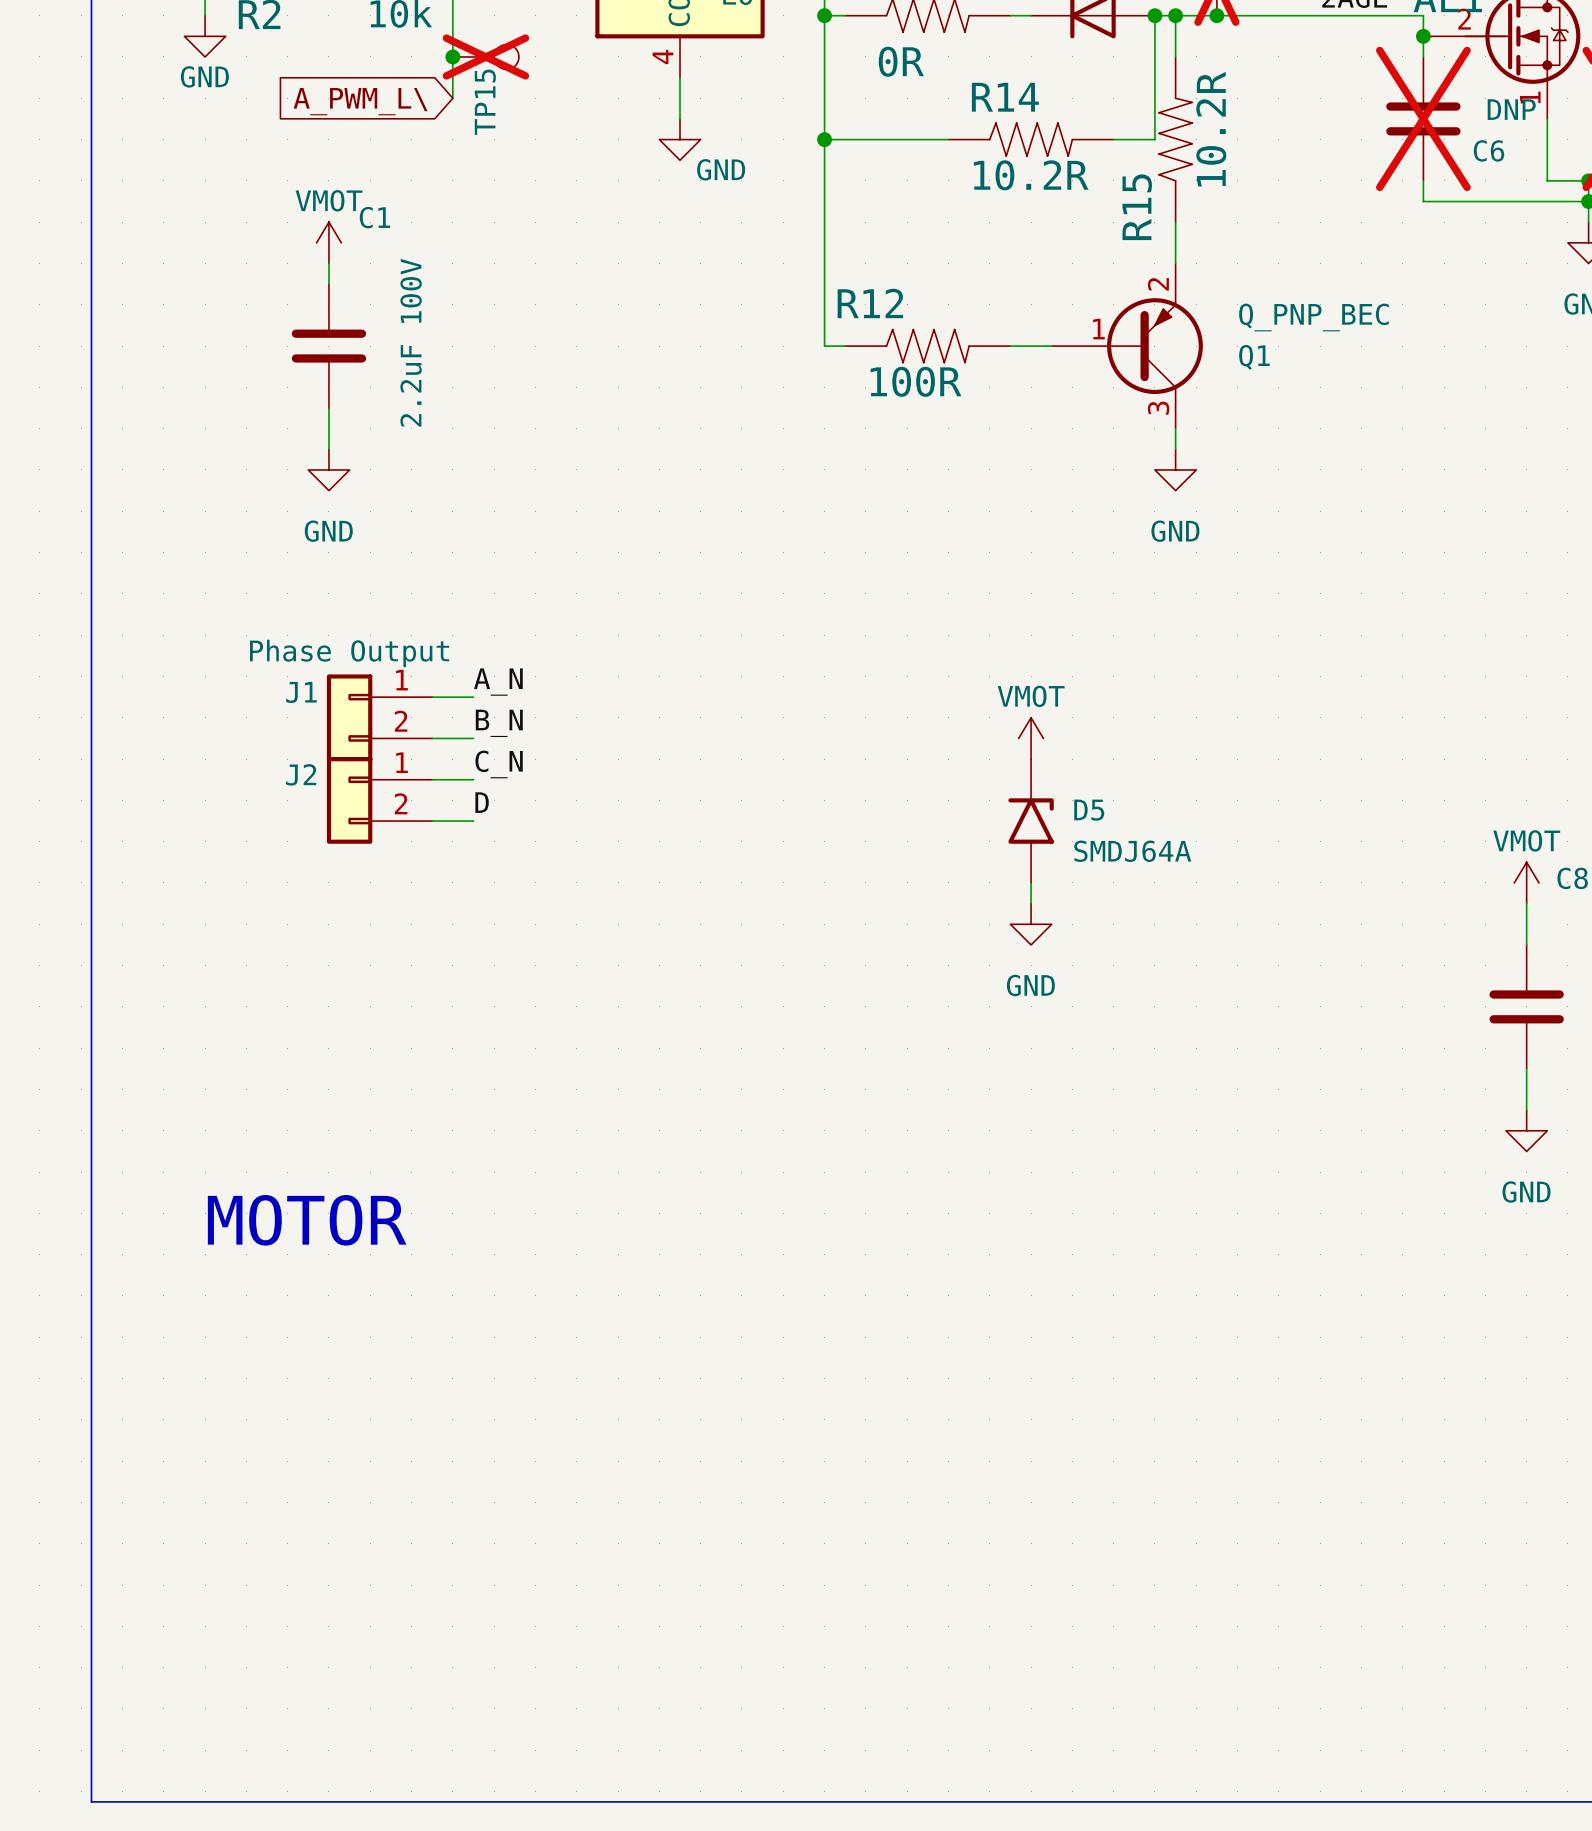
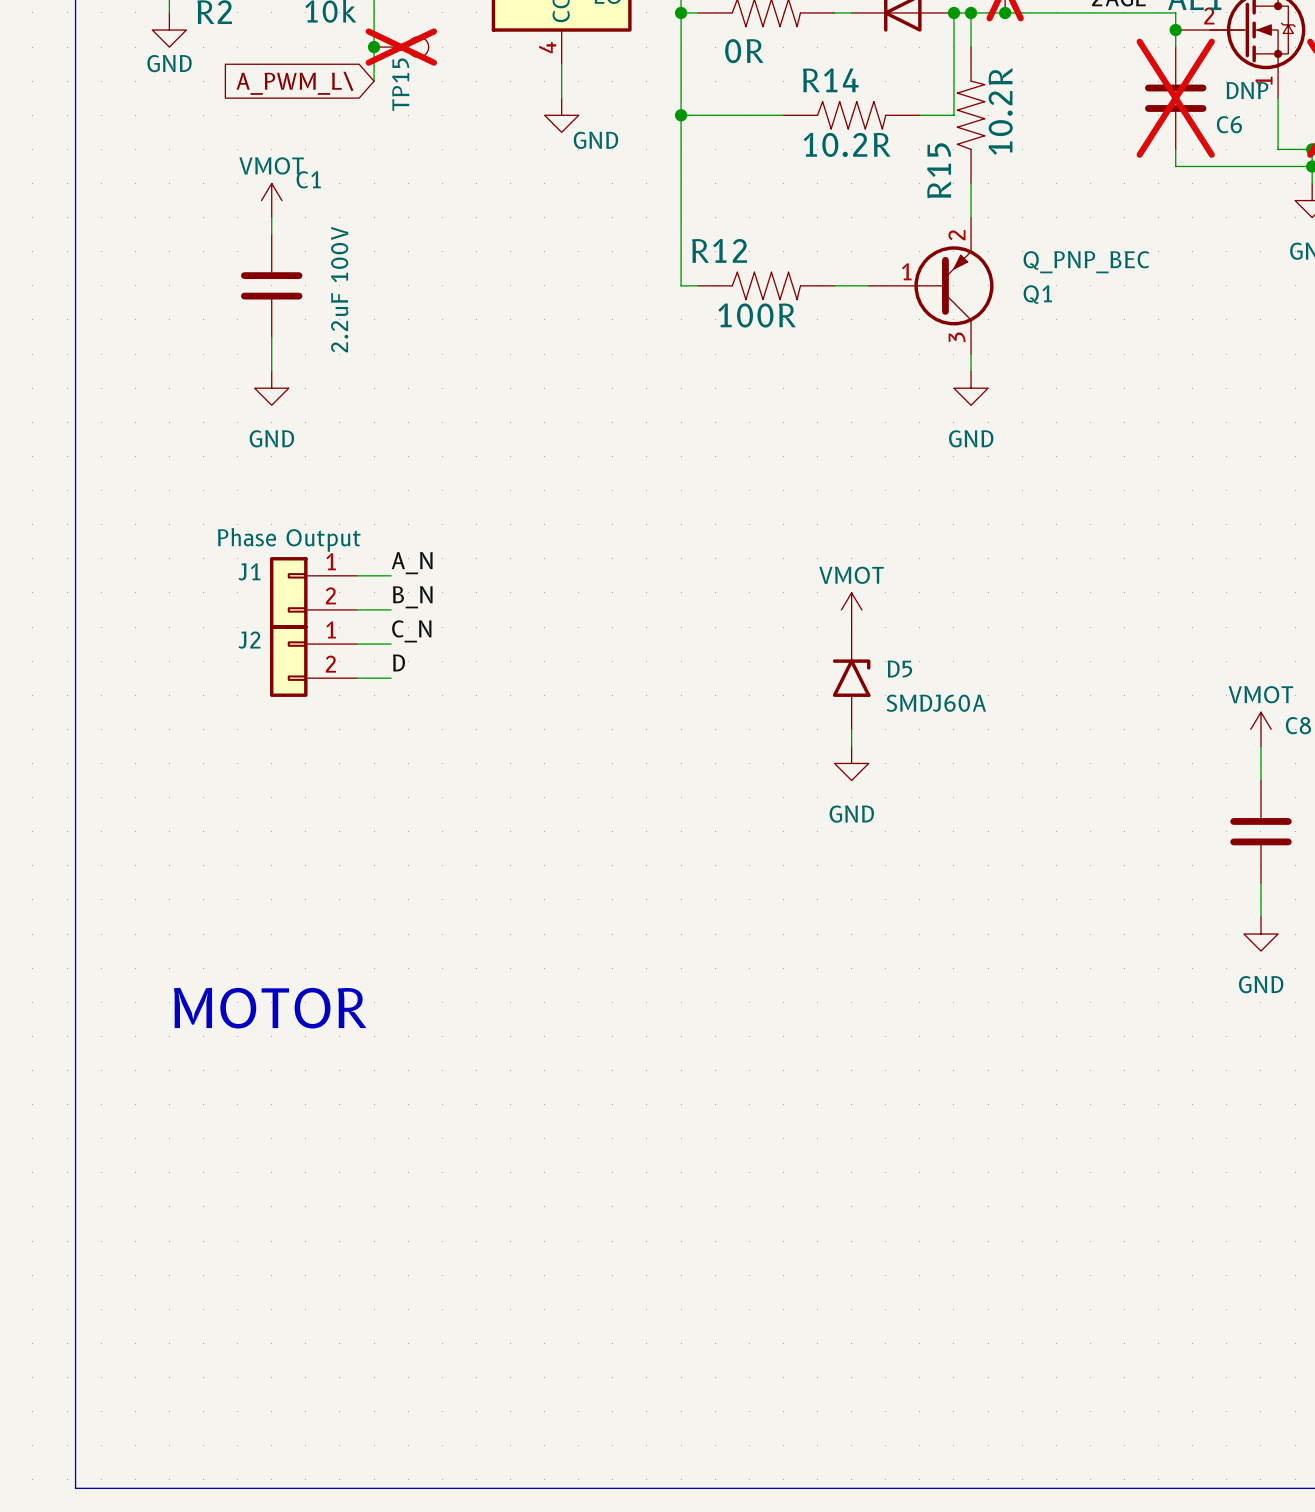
D5 value: SMDJ64A (1132, 851) -> SMDJ60A (936, 703)

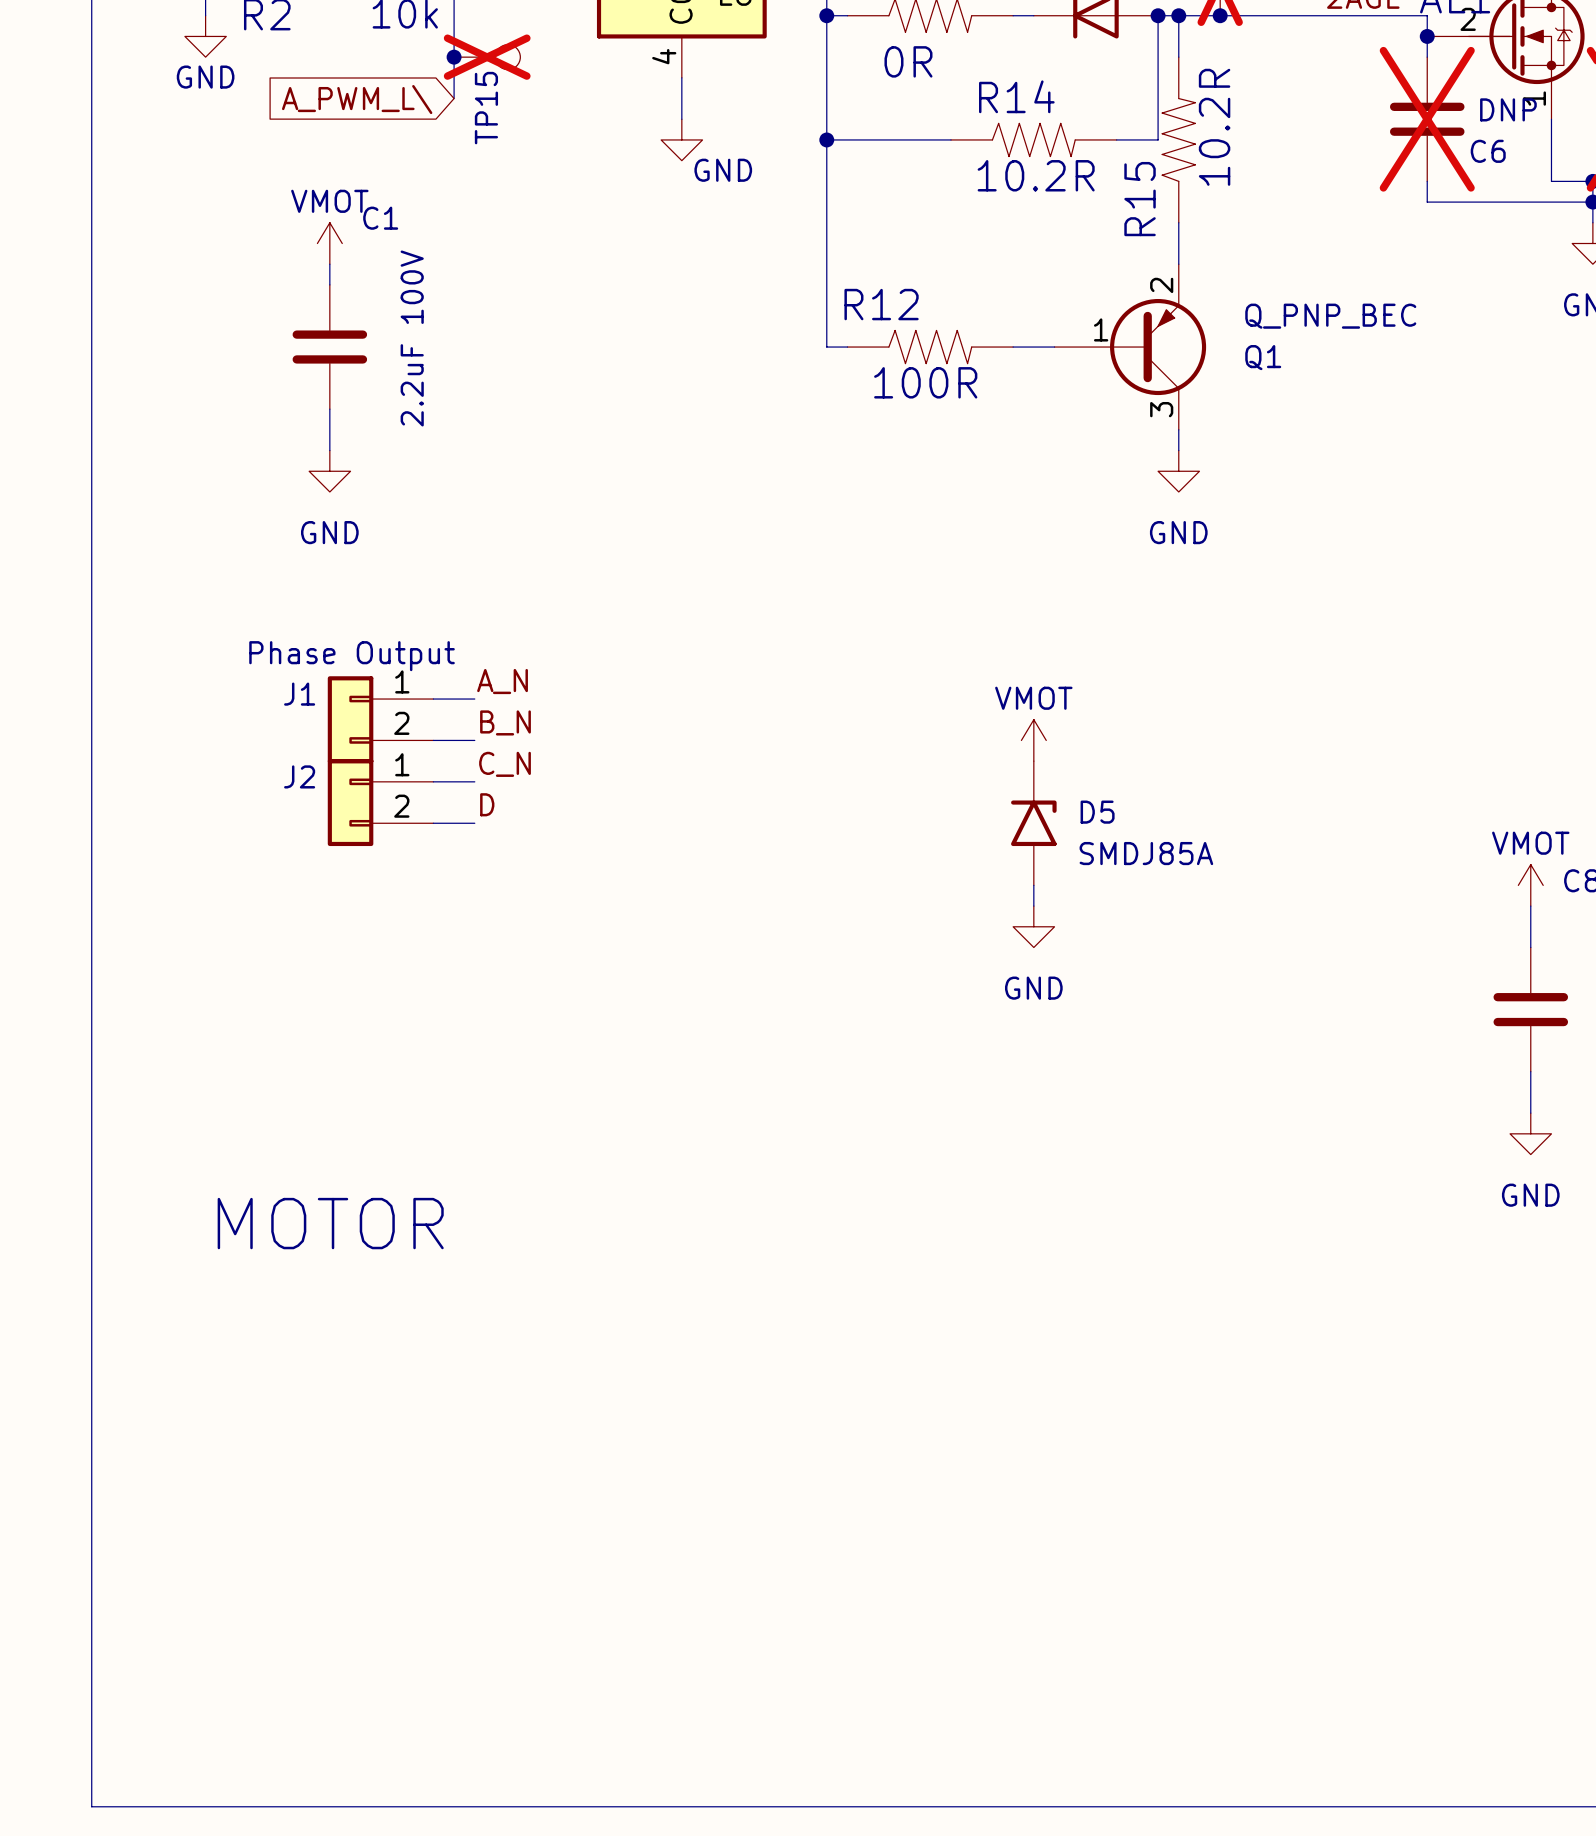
D5 value: SMDJ60A (936, 703) -> SMDJ85A (1146, 853)

